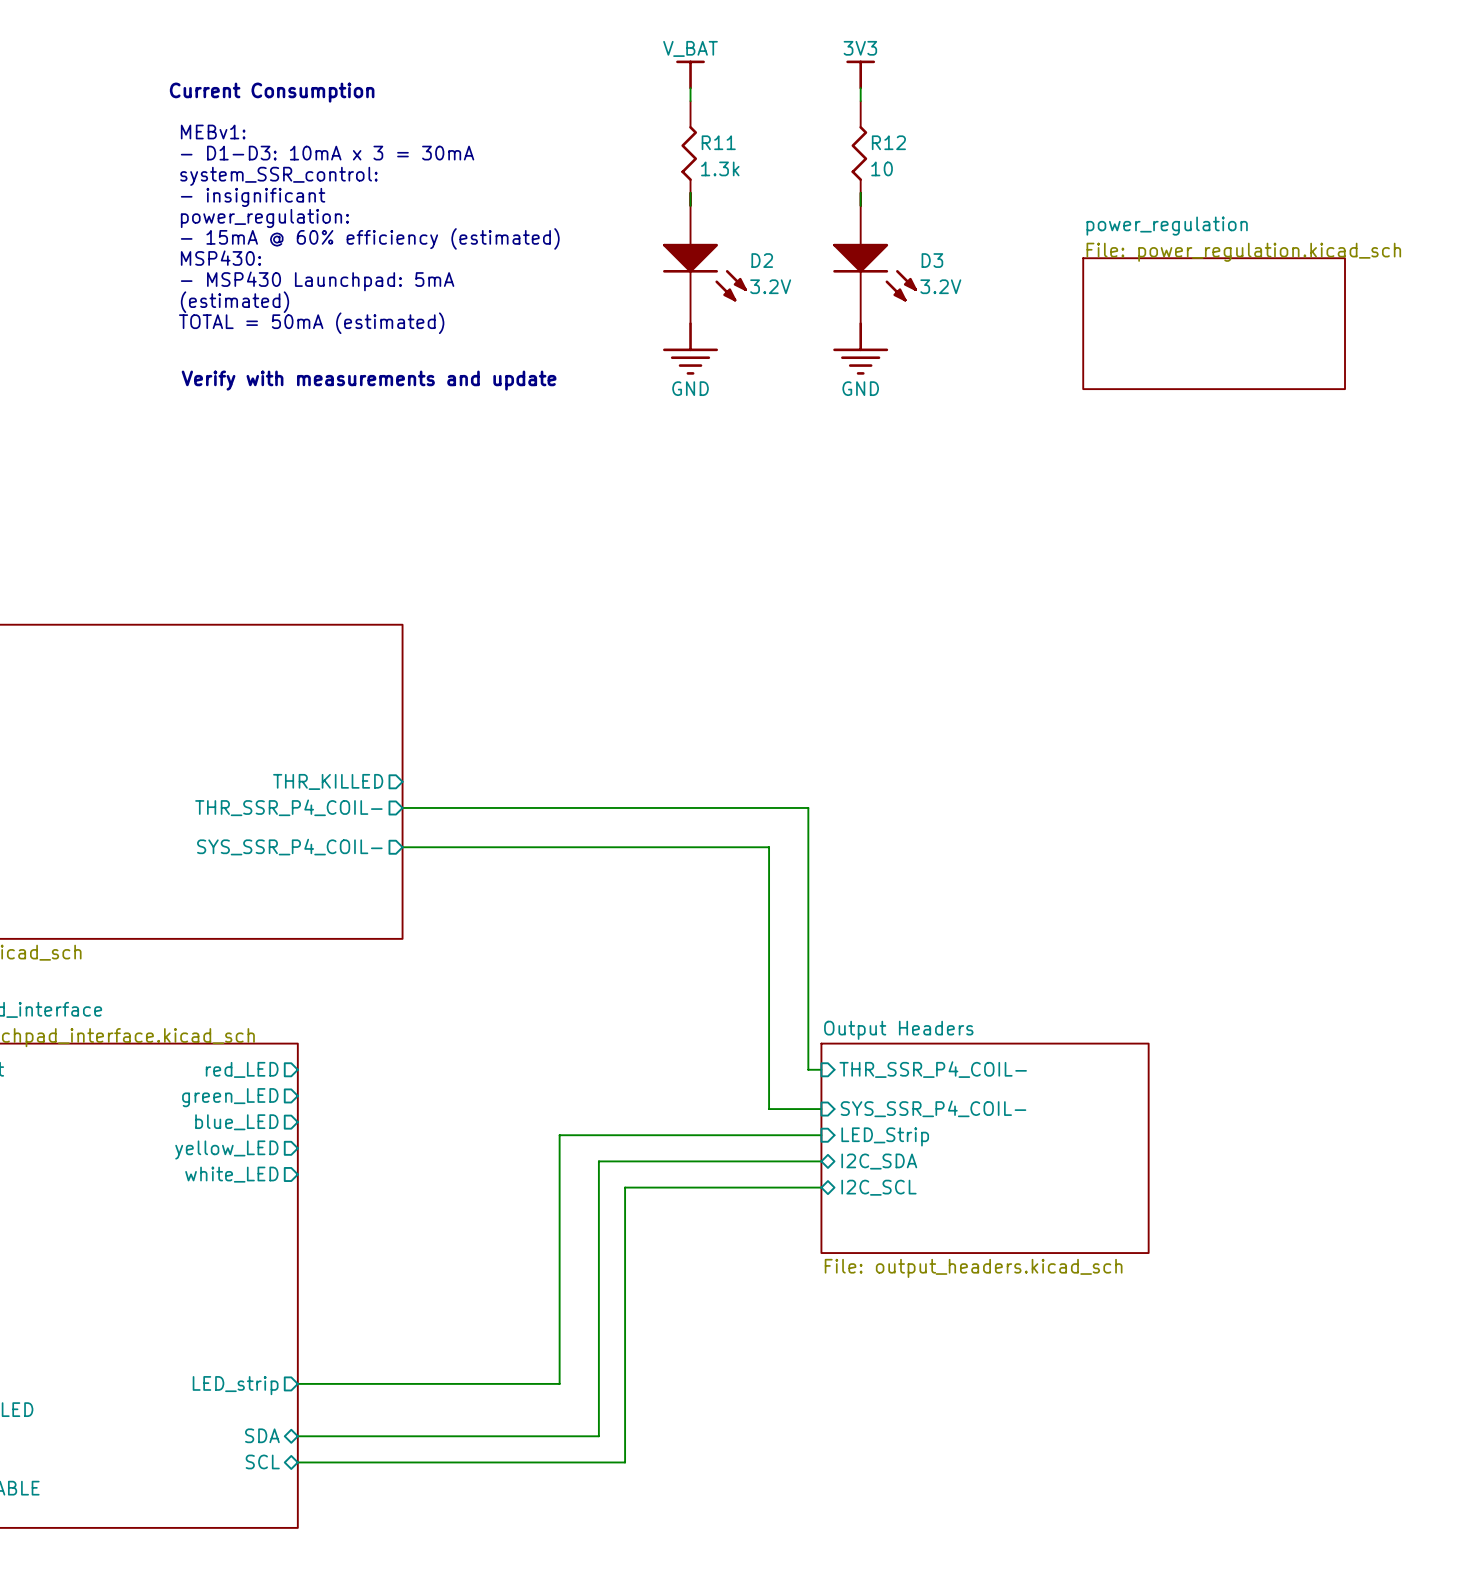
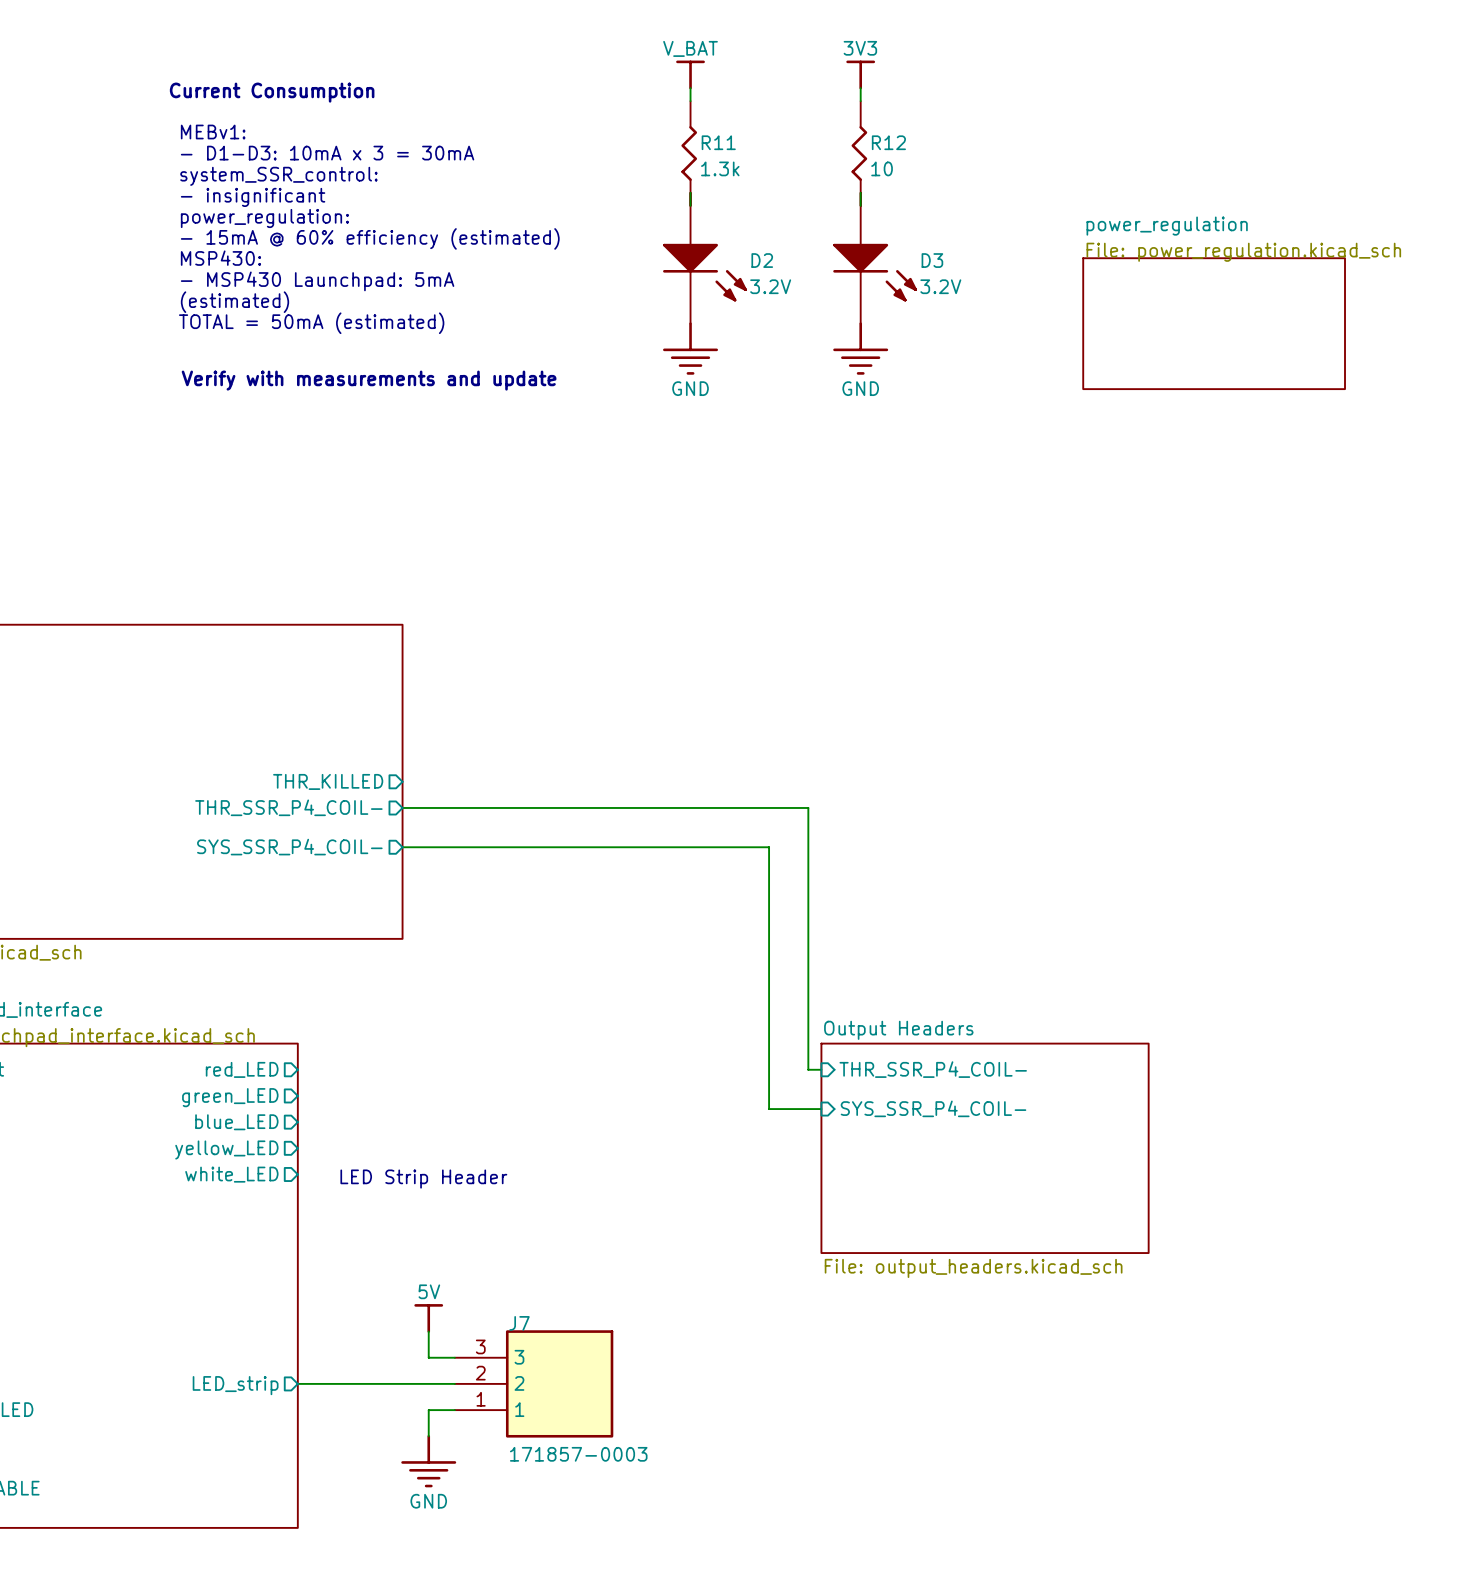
wire: (821, 1135) (559, 1135) (559, 1383) (454, 1383) -> none
sheet pin: LED_Strip (885, 1136) -> none
wire: (821, 1161) (598, 1161) (598, 1436) (297, 1436) -> none
sheet pin: I2C_SDA (879, 1161) -> none
text: none -> LED Strip Header (423, 1179)
wire: (821, 1187) (625, 1187) (625, 1462) (297, 1462) -> none
sheet pin: I2C_SCL (878, 1187) -> none
power symbol: none -> 5V (428, 1318)
wire: none -> (428, 1331) (428, 1357) (454, 1357)
J7: none -> 171857-0003 (534, 1383)
wire: none -> (454, 1410) (428, 1410) (428, 1436)
sheet pin: SDA (262, 1435) -> none
sheet pin: SCL (262, 1461) -> none
power symbol: none -> GND (428, 1461)

